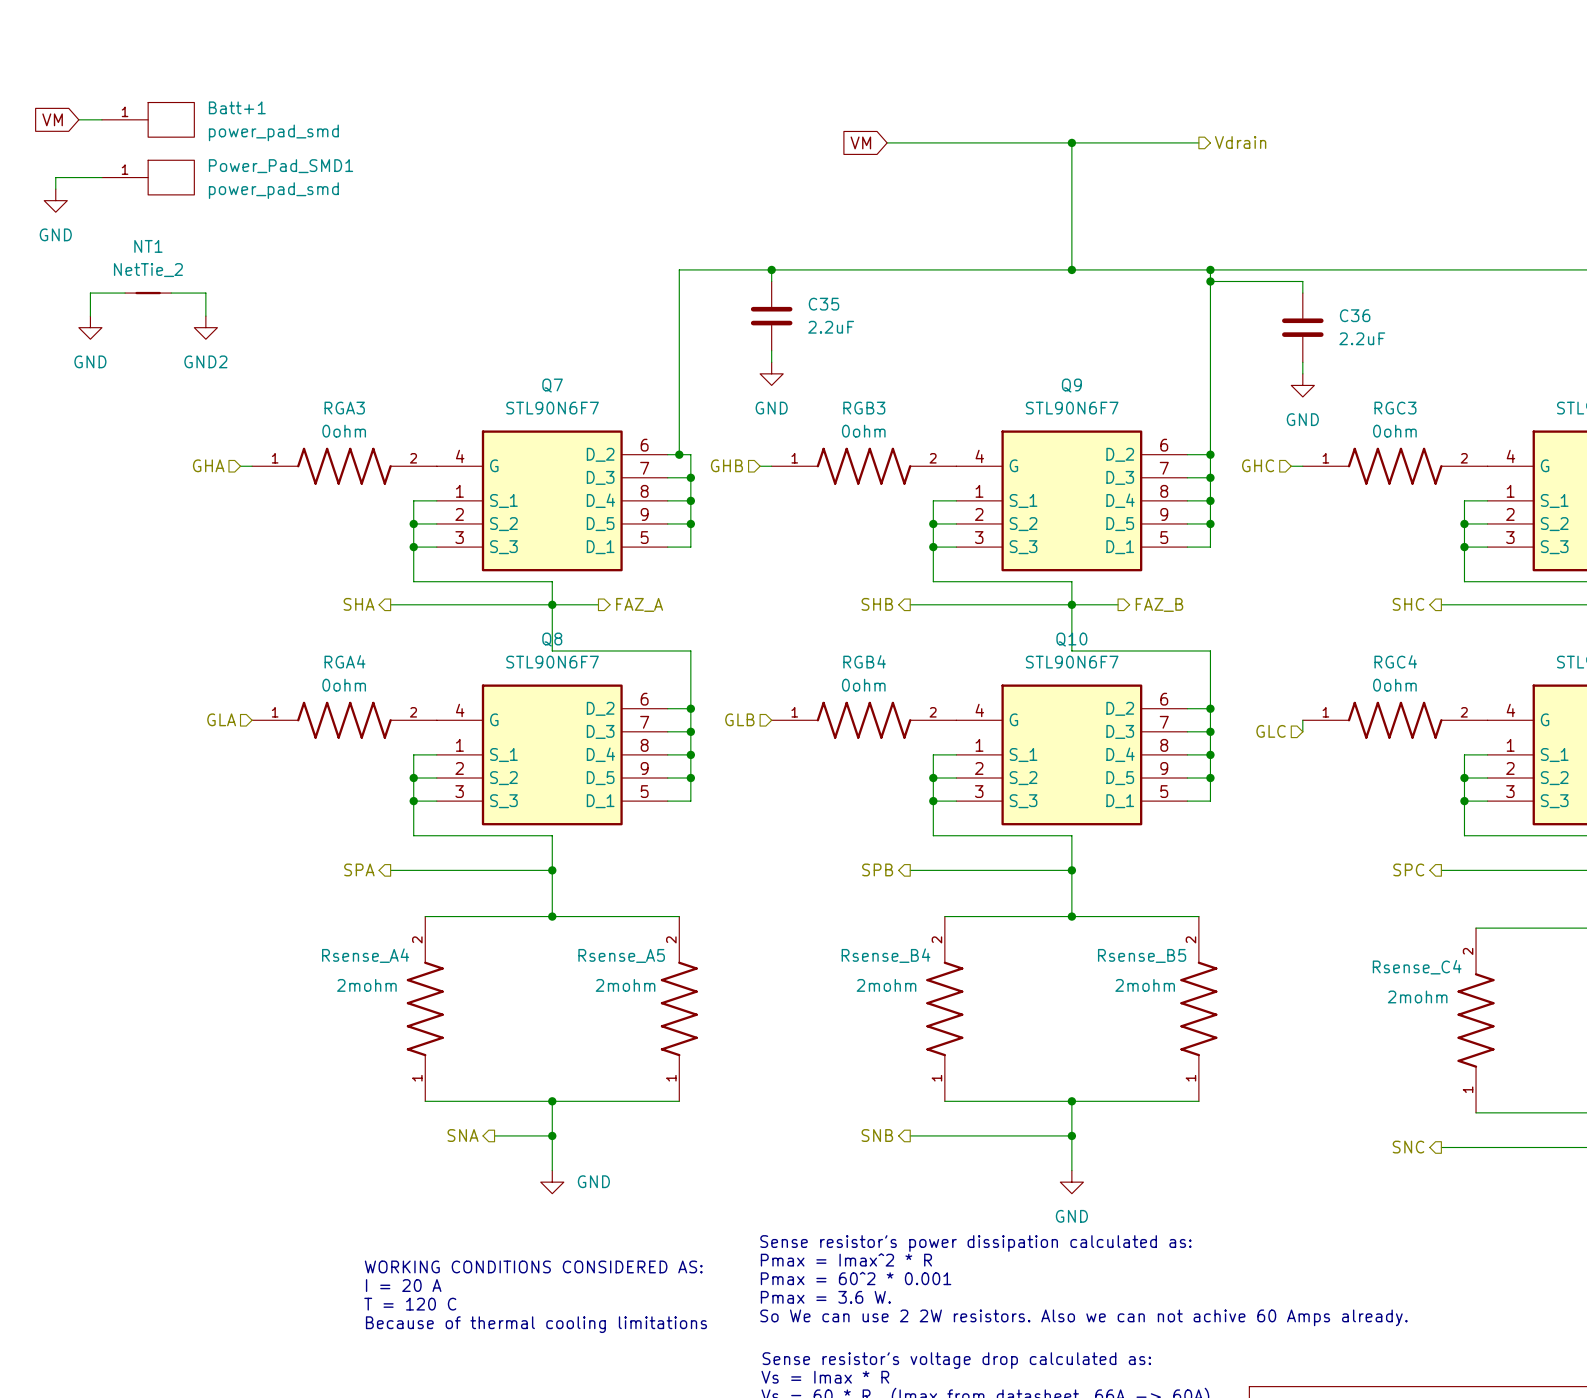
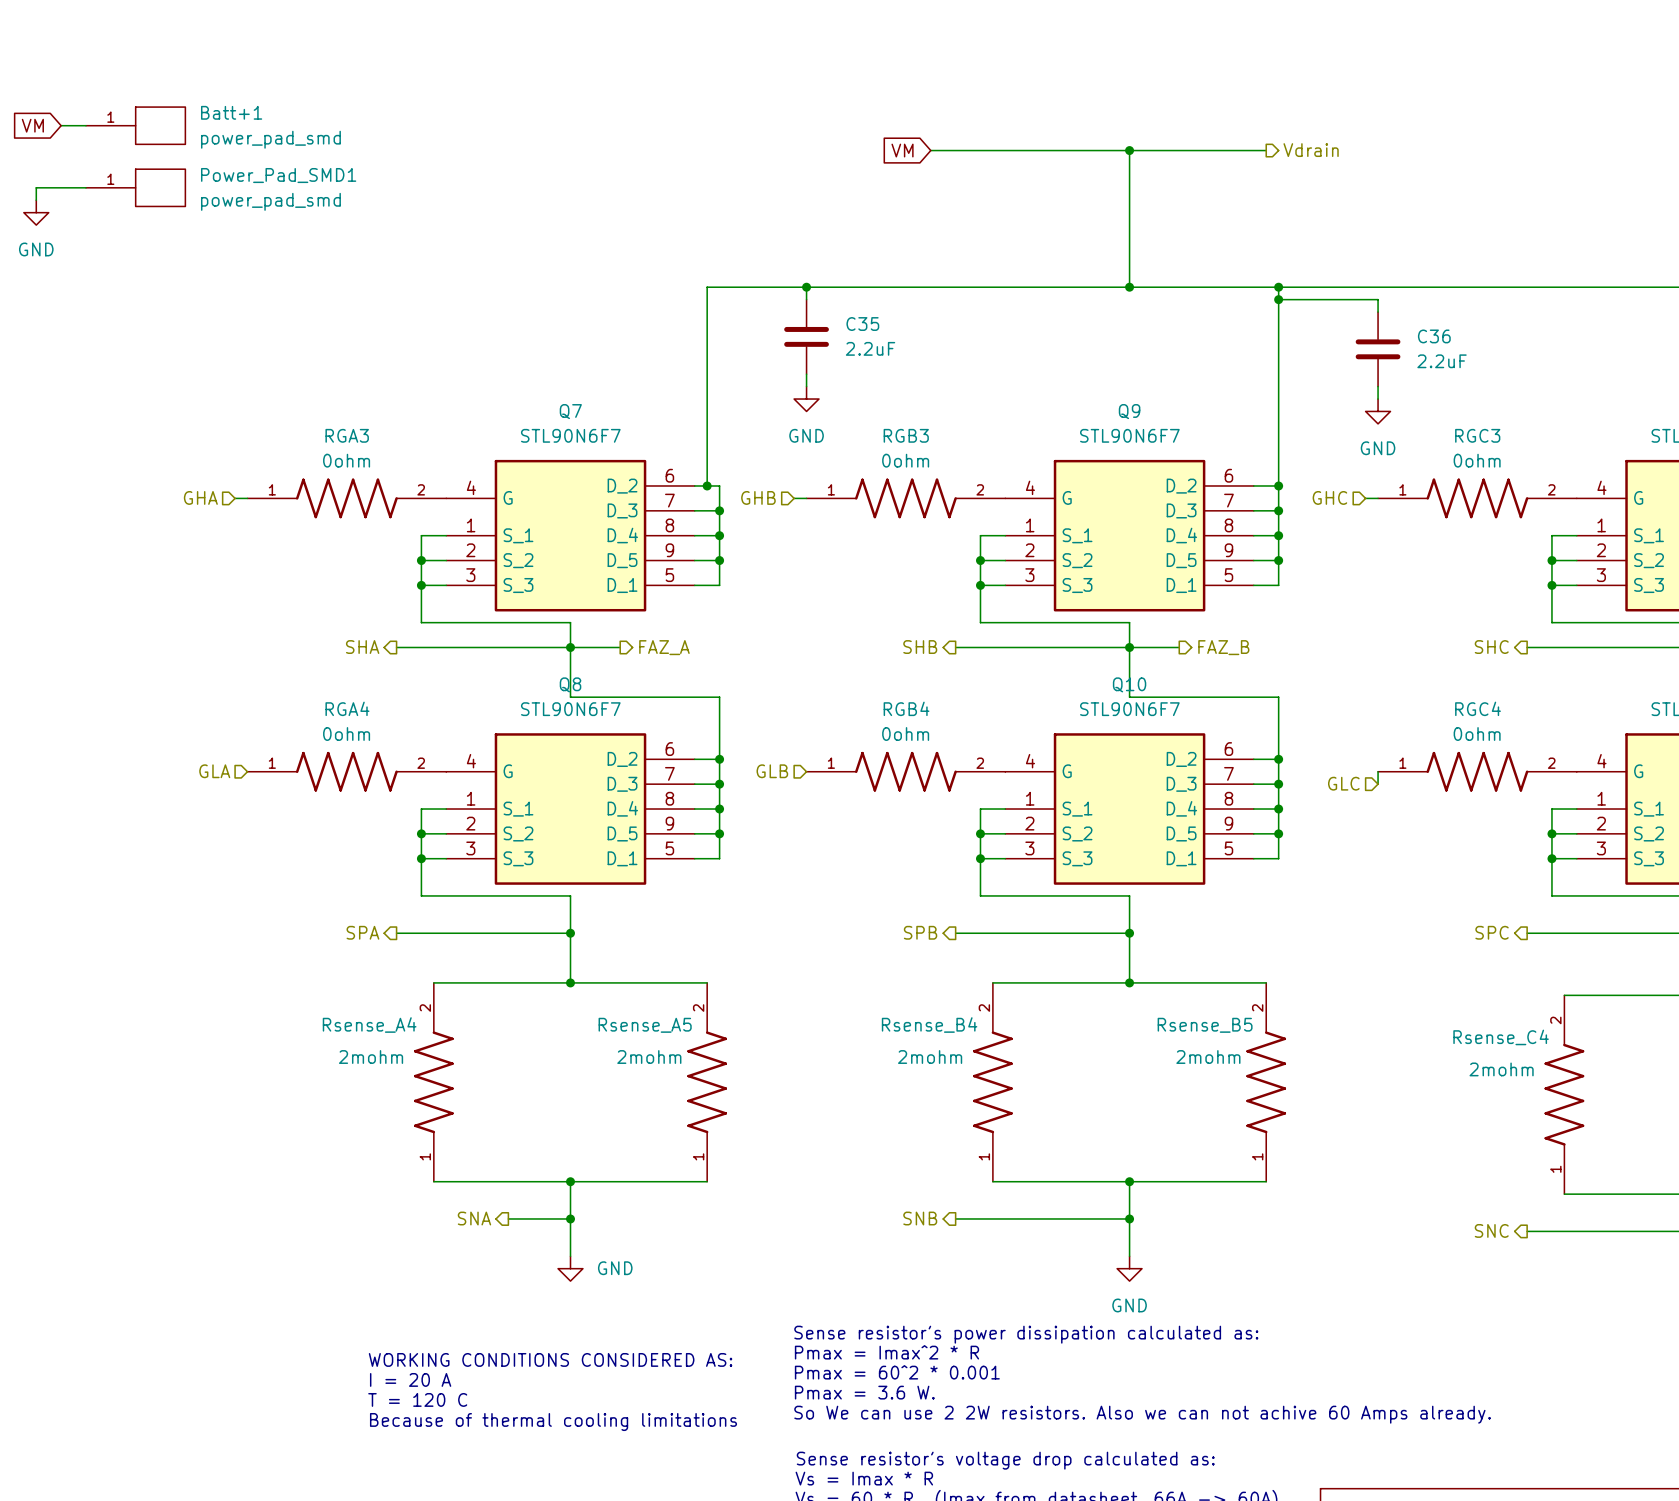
wire: (125, 293) (90, 293) (90, 316) -> none
NT1: NetTie_2 (148, 293) -> none
wire: (171, 293) (205, 293) (205, 316) -> none
power symbol: GND (90, 327) -> none
power symbol: GND2 (205, 327) -> none

